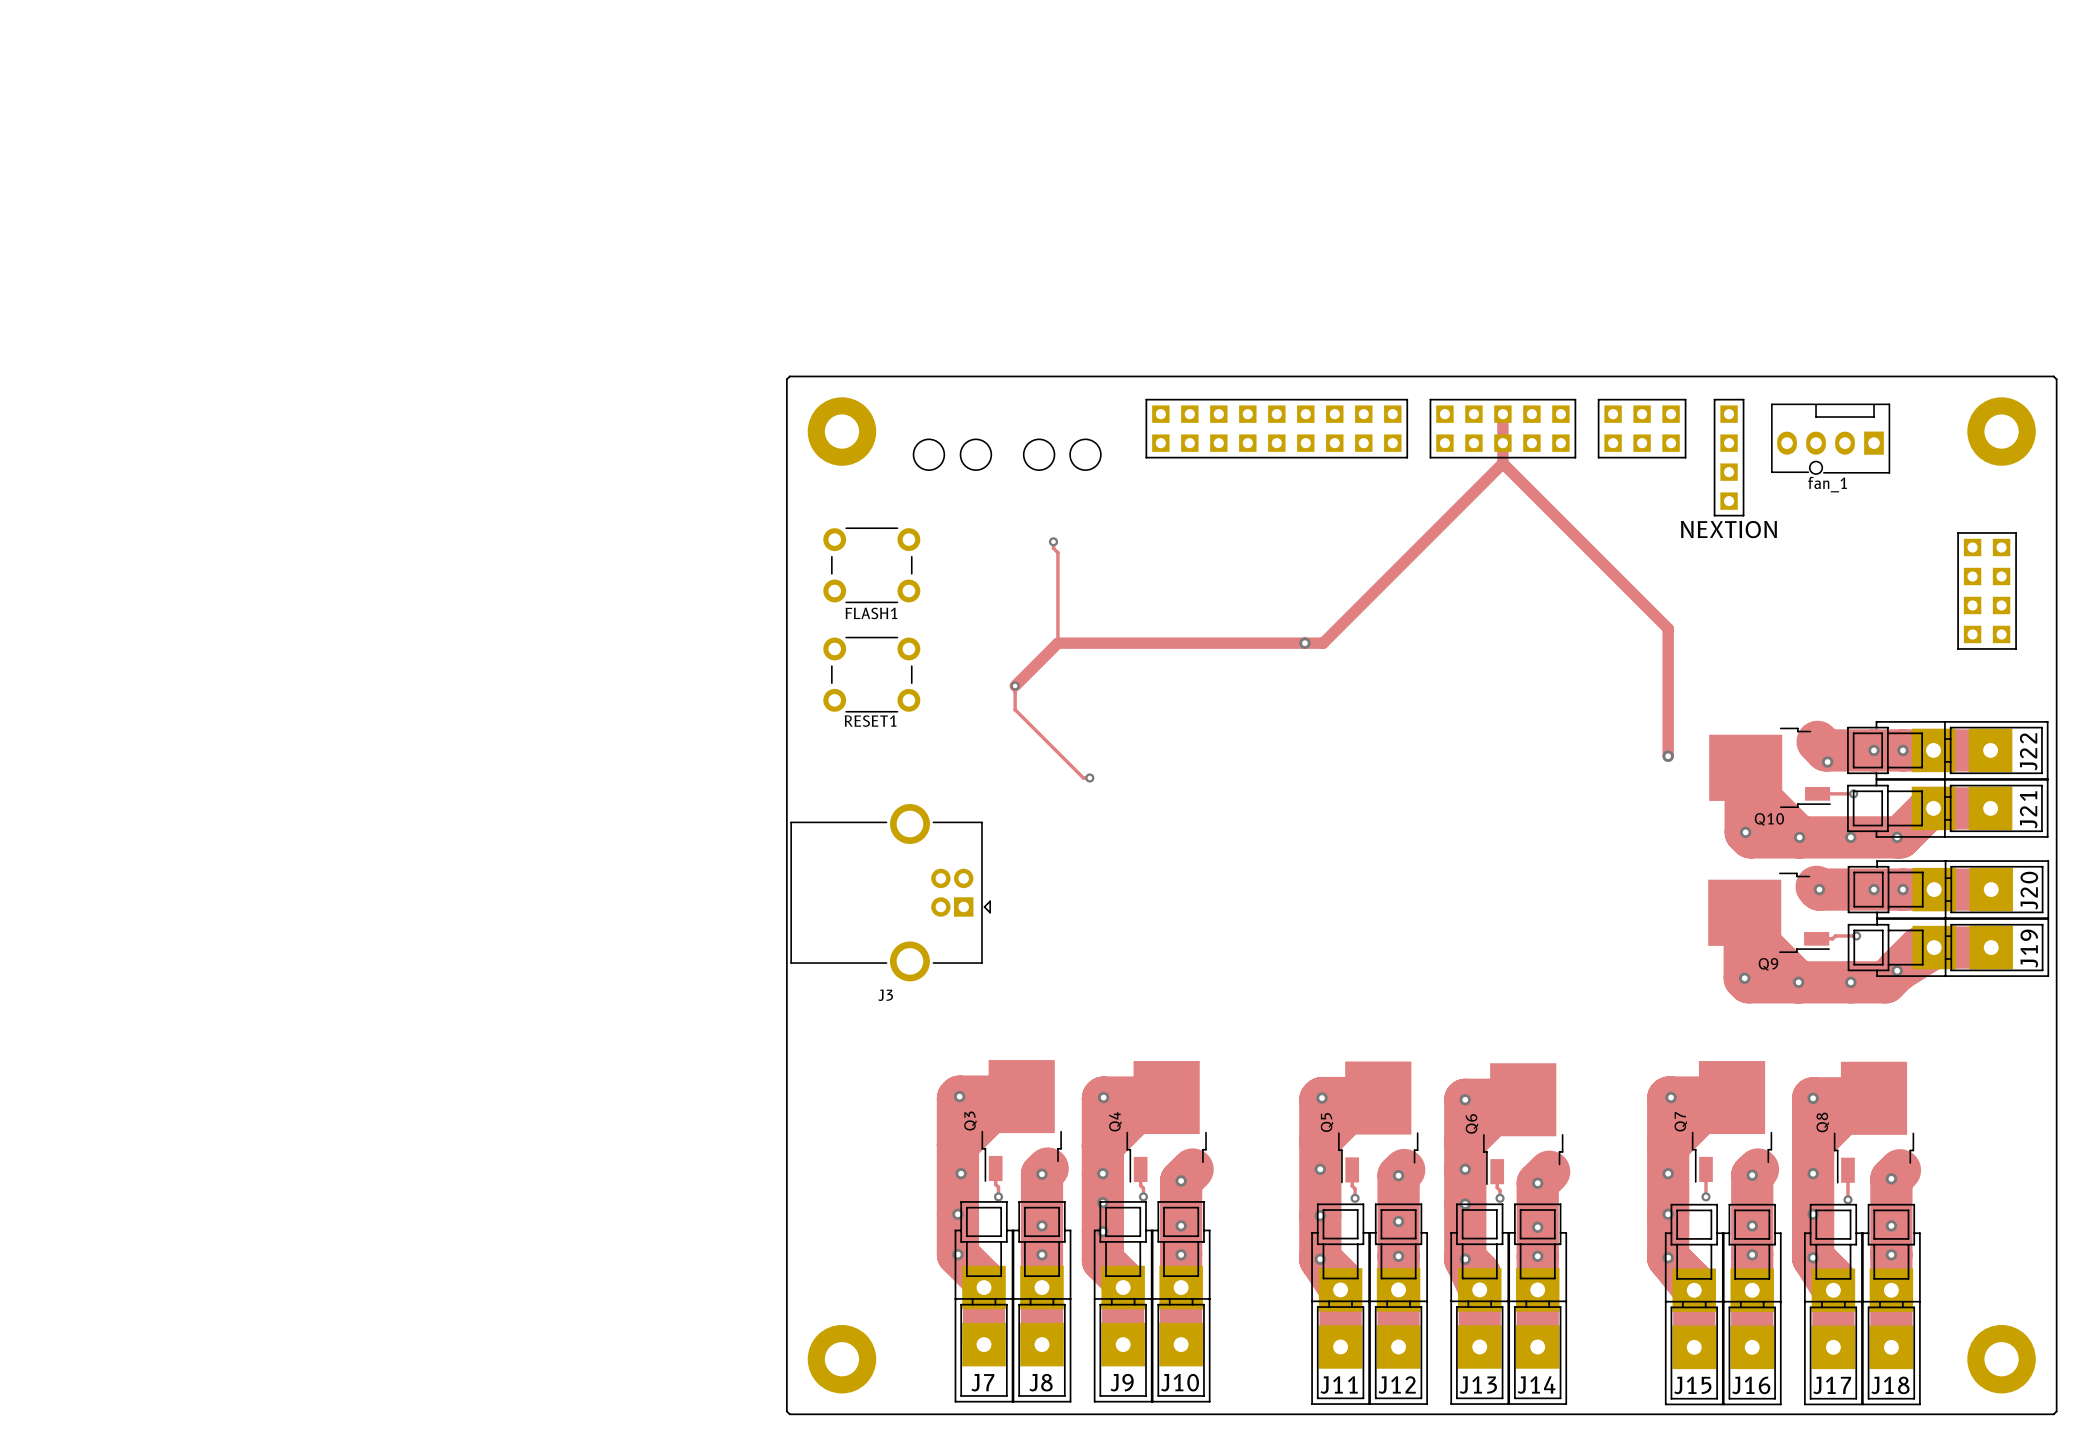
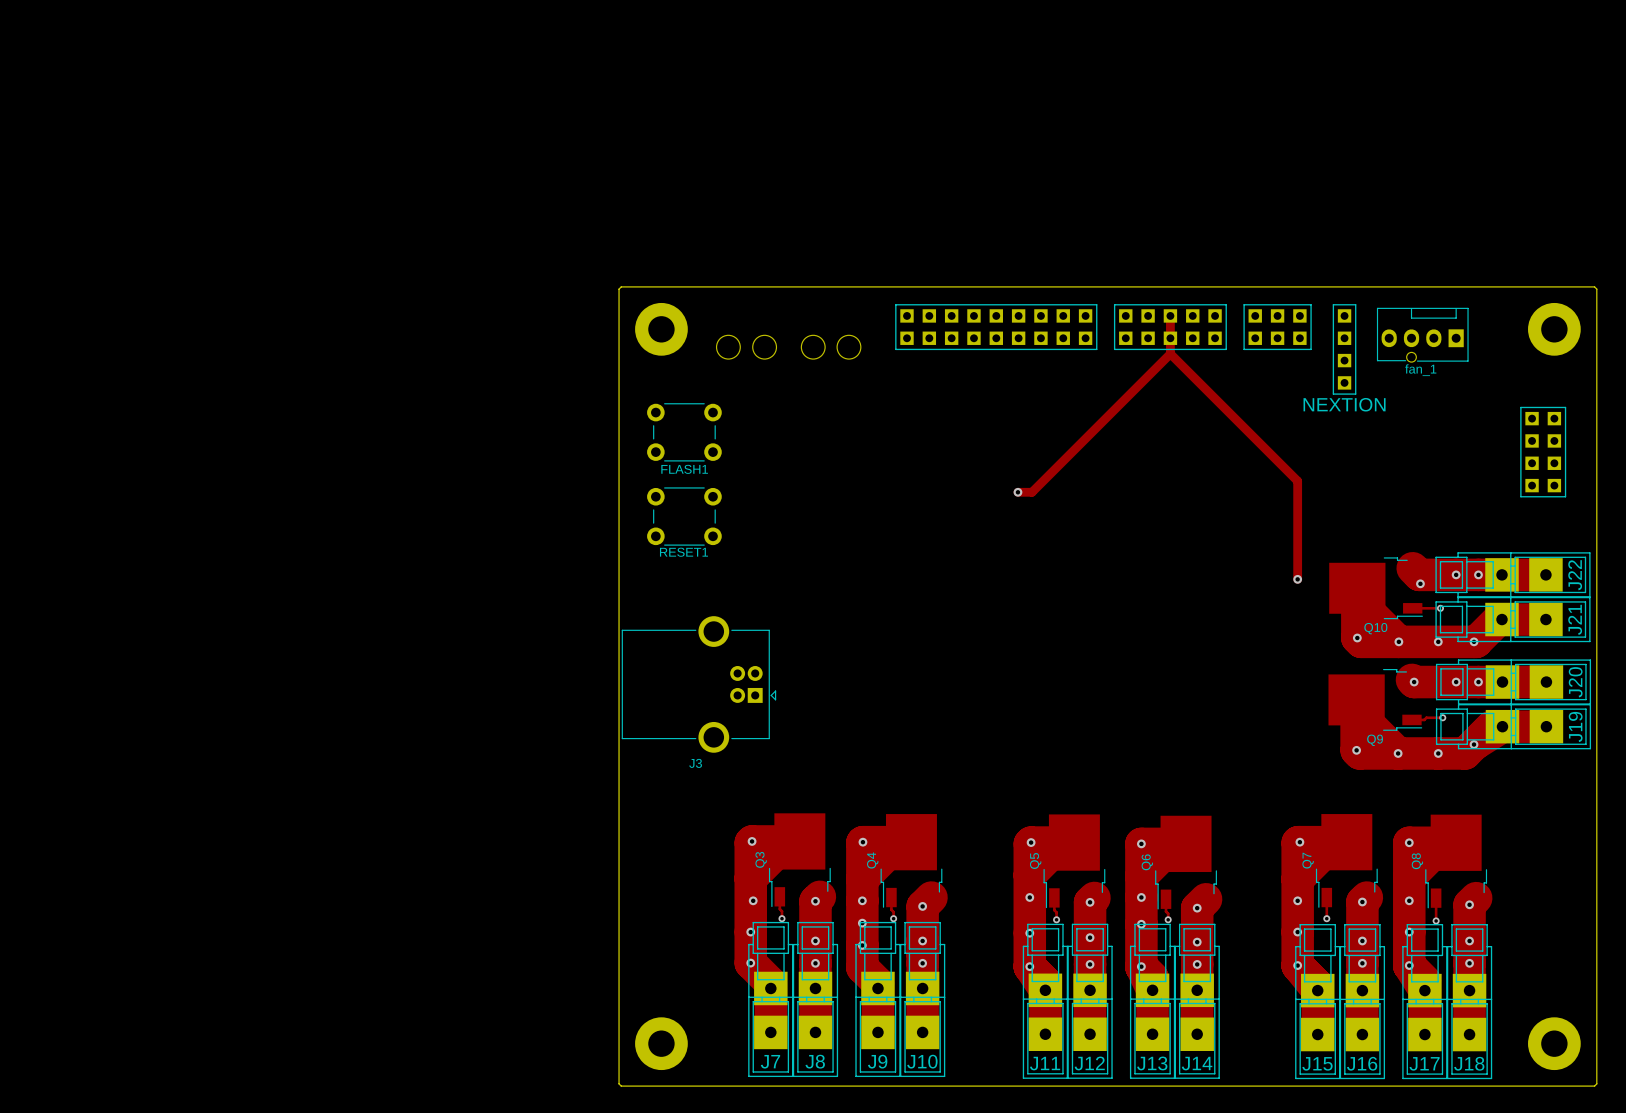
track: (1053, 541) (1053, 548) (1057, 552) (1057, 643) -> none
via: (1053, 541) -> none
track: (1057, 643) (1304, 643) -> none
track: (1057, 643) (1015, 685) (1015, 709) (1083, 777) (1089, 777) -> none
via: (1015, 685) -> none
via: (1089, 777) -> none

